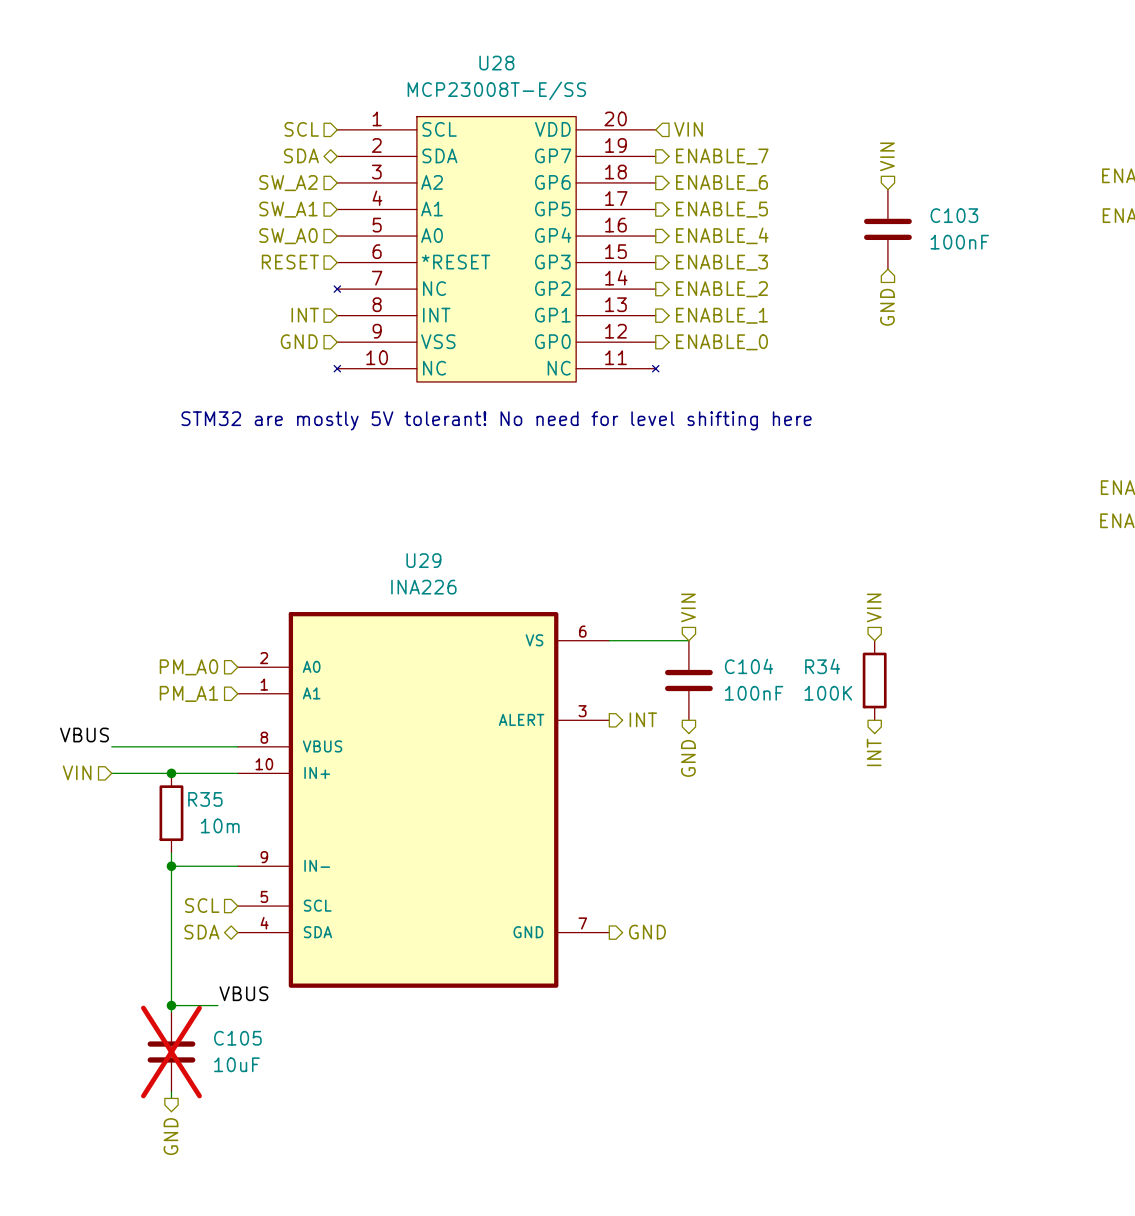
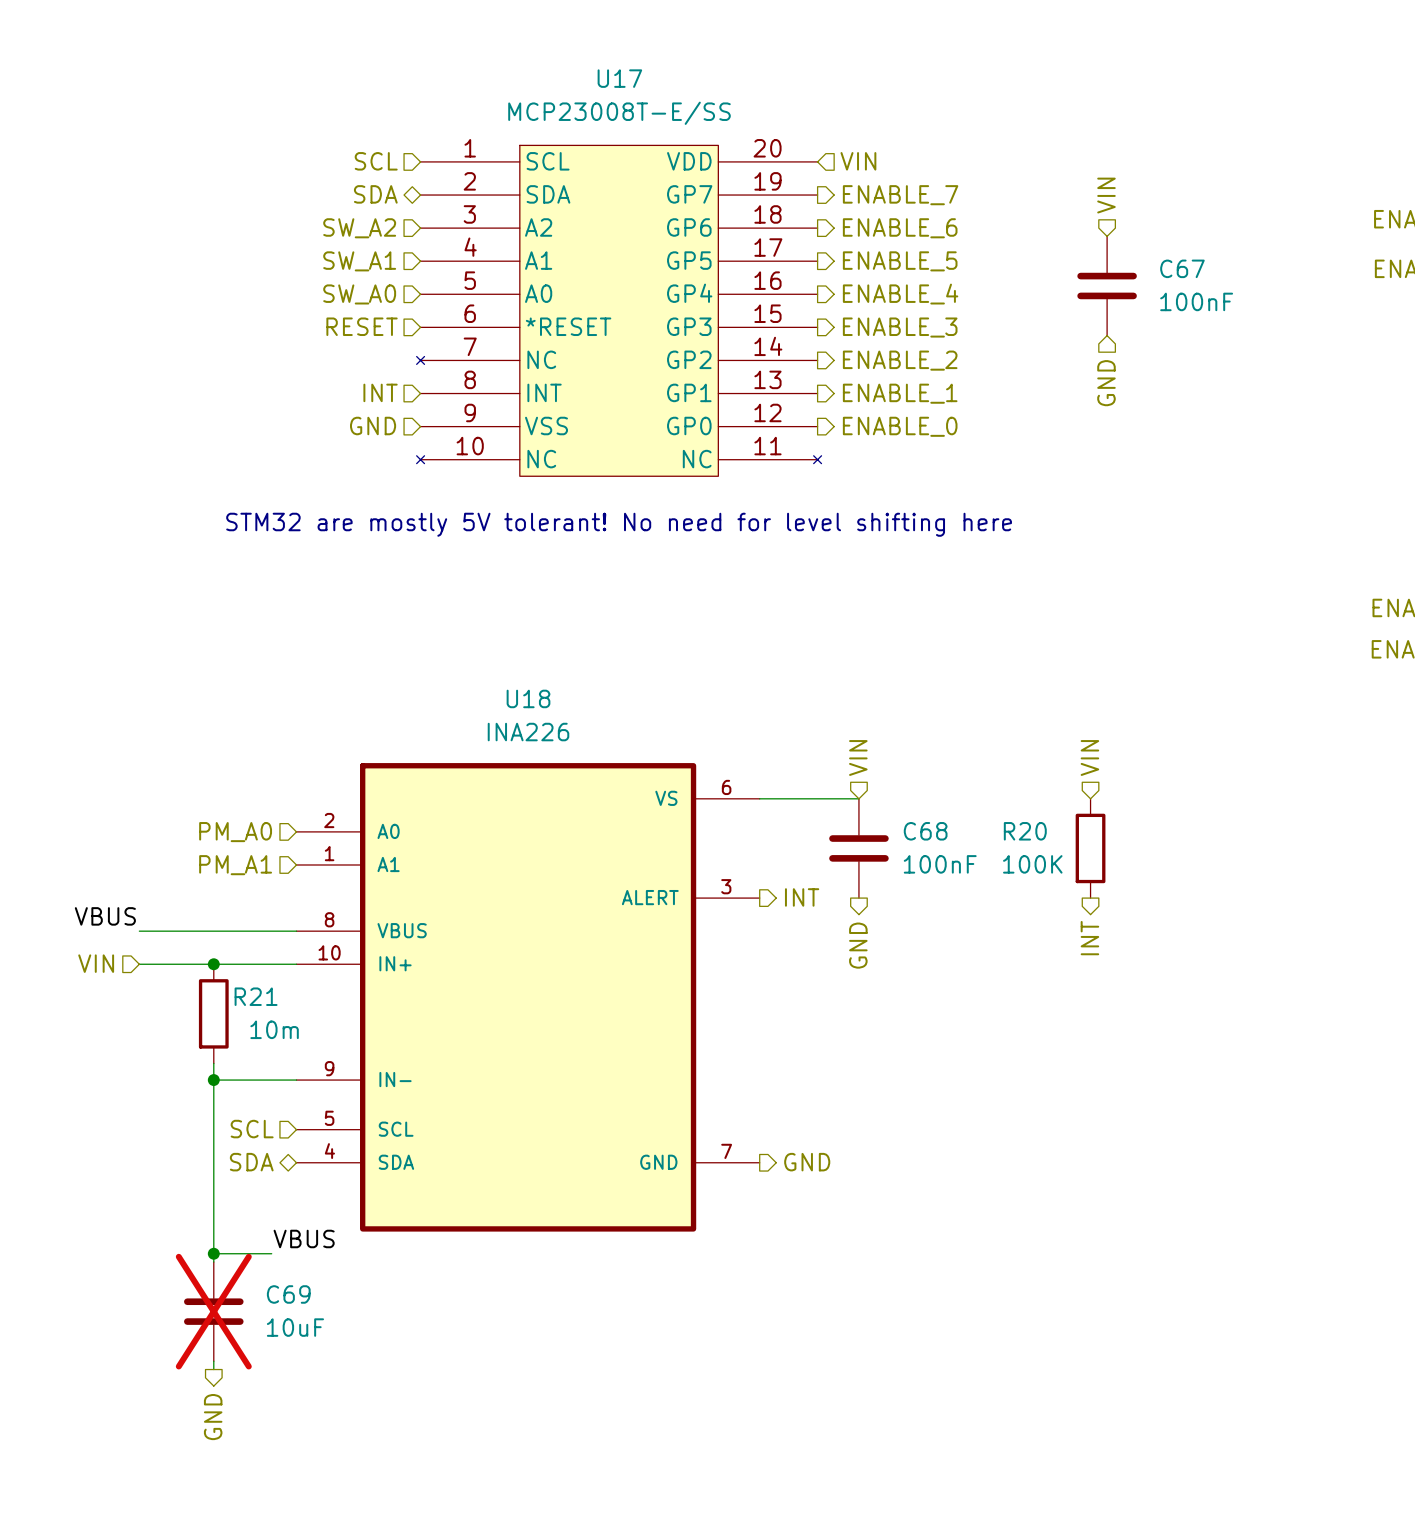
U28 name: U28 (496, 63) -> U17 (619, 78)
C103 name: C103 (954, 215) -> C67 (1182, 268)
U29 name: U29 (423, 560) -> U18 (528, 698)
C104 name: C104 (749, 666) -> C68 (925, 831)
R34 name: R34 (822, 666) -> R20 (1025, 831)
R35 name: R35 (205, 799) -> R21 (256, 996)
C105 name: C105 (237, 1038) -> C69 (288, 1294)

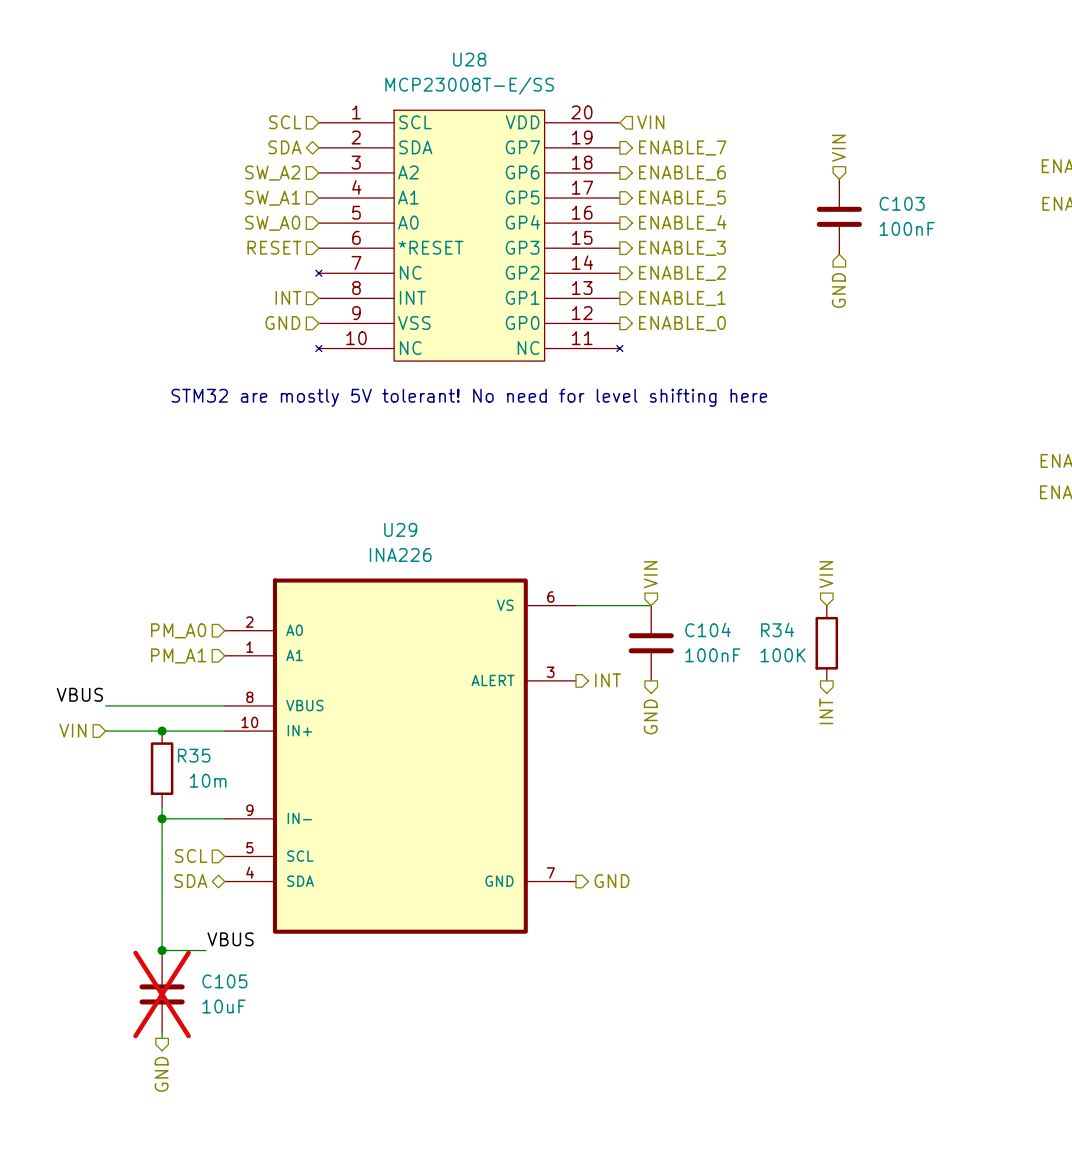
U17 name: U17 (619, 78) -> U28 (469, 59)
C67 name: C67 (1182, 268) -> C103 (902, 203)
U18 name: U18 (528, 698) -> U29 (400, 529)
C68 name: C68 (925, 831) -> C104 (708, 629)
R20 name: R20 (1025, 831) -> R34 (777, 629)
R21 name: R21 (256, 996) -> R35 (194, 755)
C69 name: C69 (288, 1294) -> C105 (224, 981)

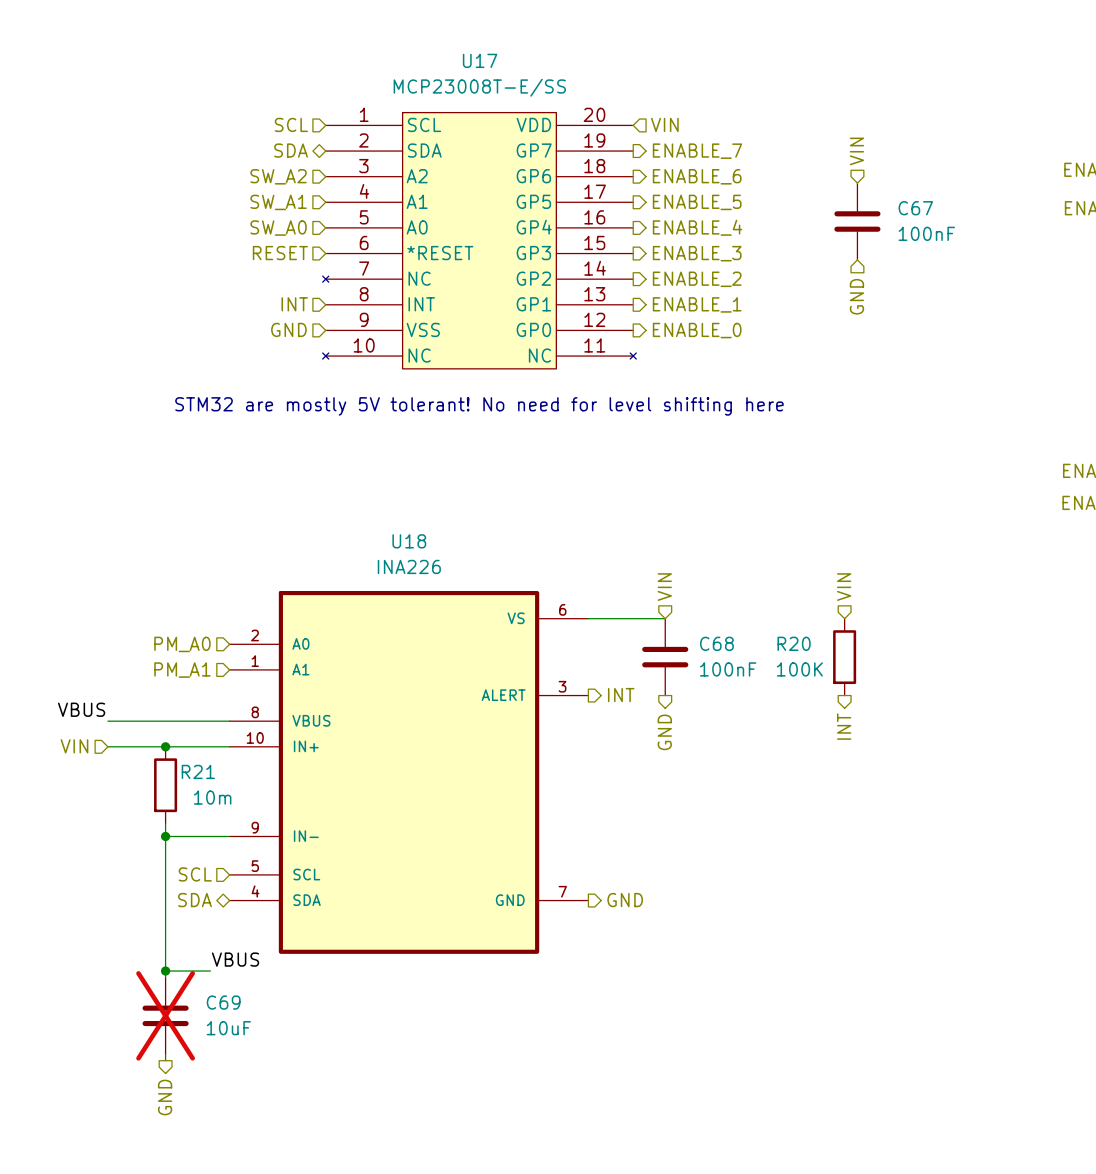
U28 name: U28 (469, 59) -> U17 (480, 60)
C103 name: C103 (902, 203) -> C67 (915, 208)
U29 name: U29 (400, 529) -> U18 (409, 541)
C104 name: C104 (708, 629) -> C68 (716, 643)
R34 name: R34 (777, 629) -> R20 (794, 643)
R35 name: R35 (194, 755) -> R21 (198, 771)
C105 name: C105 (224, 981) -> C69 (223, 1002)

